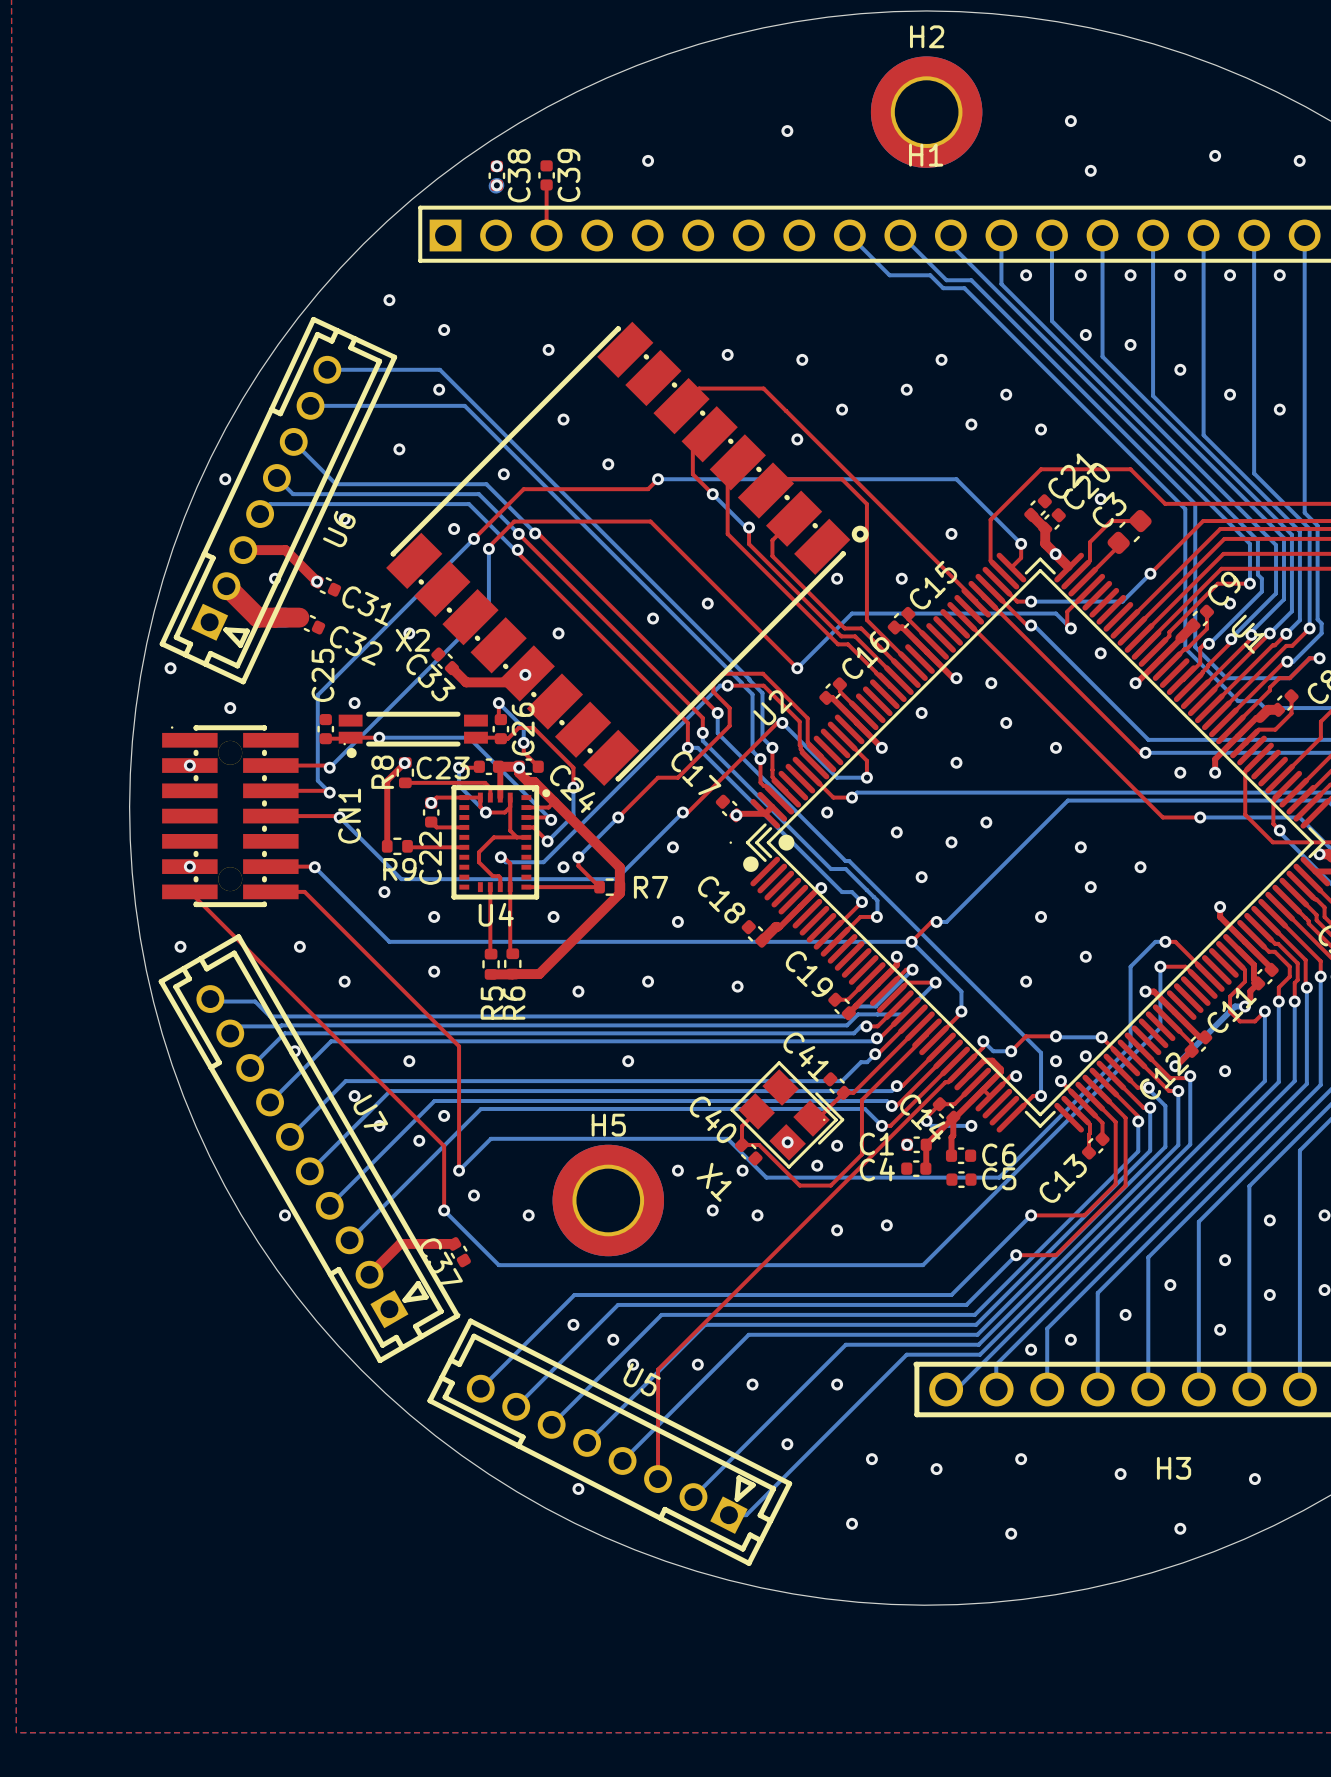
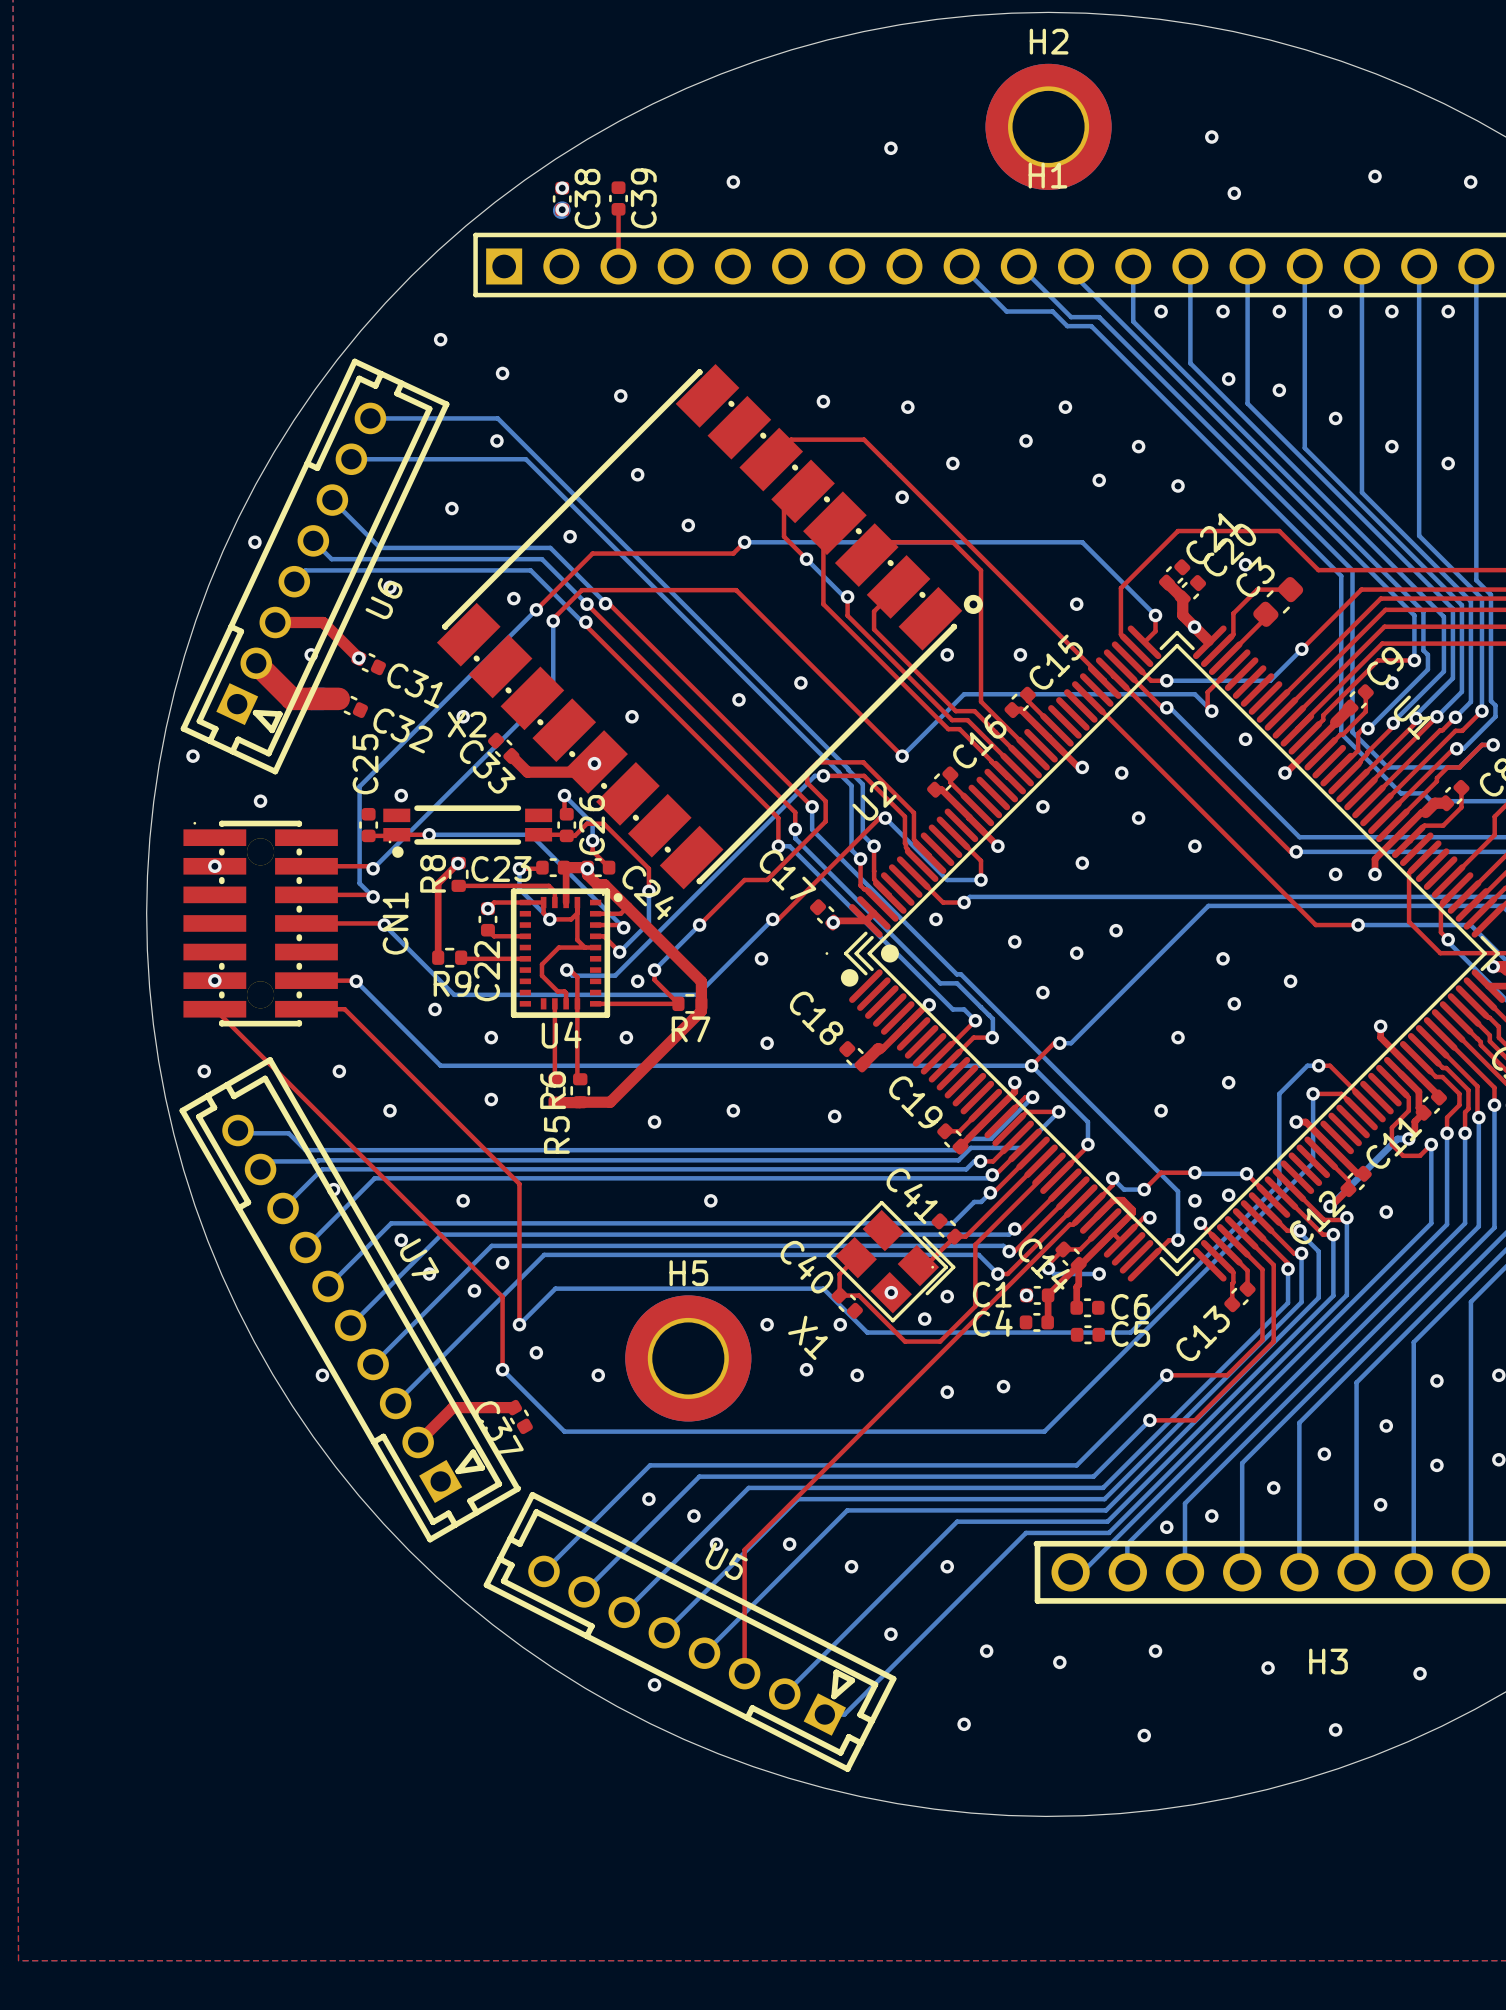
R7 name position: R7 (651, 887) -> R7 (691, 1029)
R6 name position: R6 (514, 1003) -> R6 (553, 1090)

